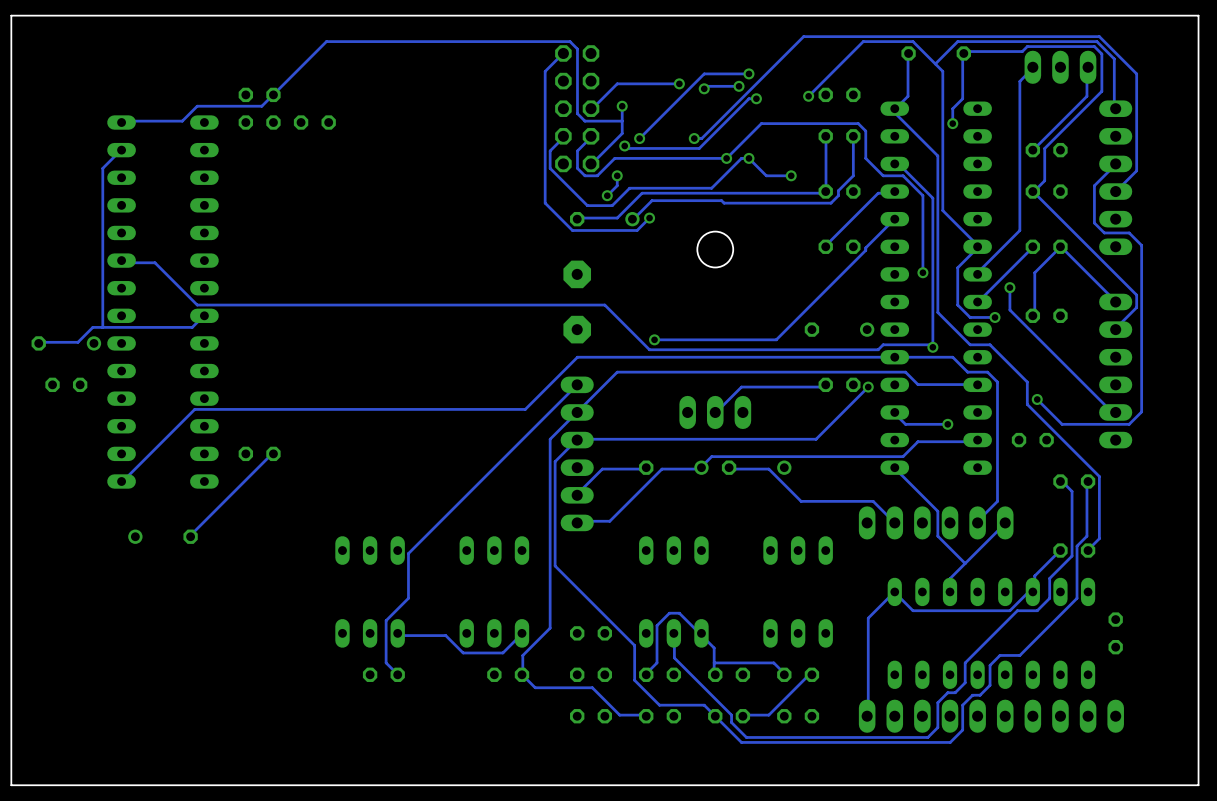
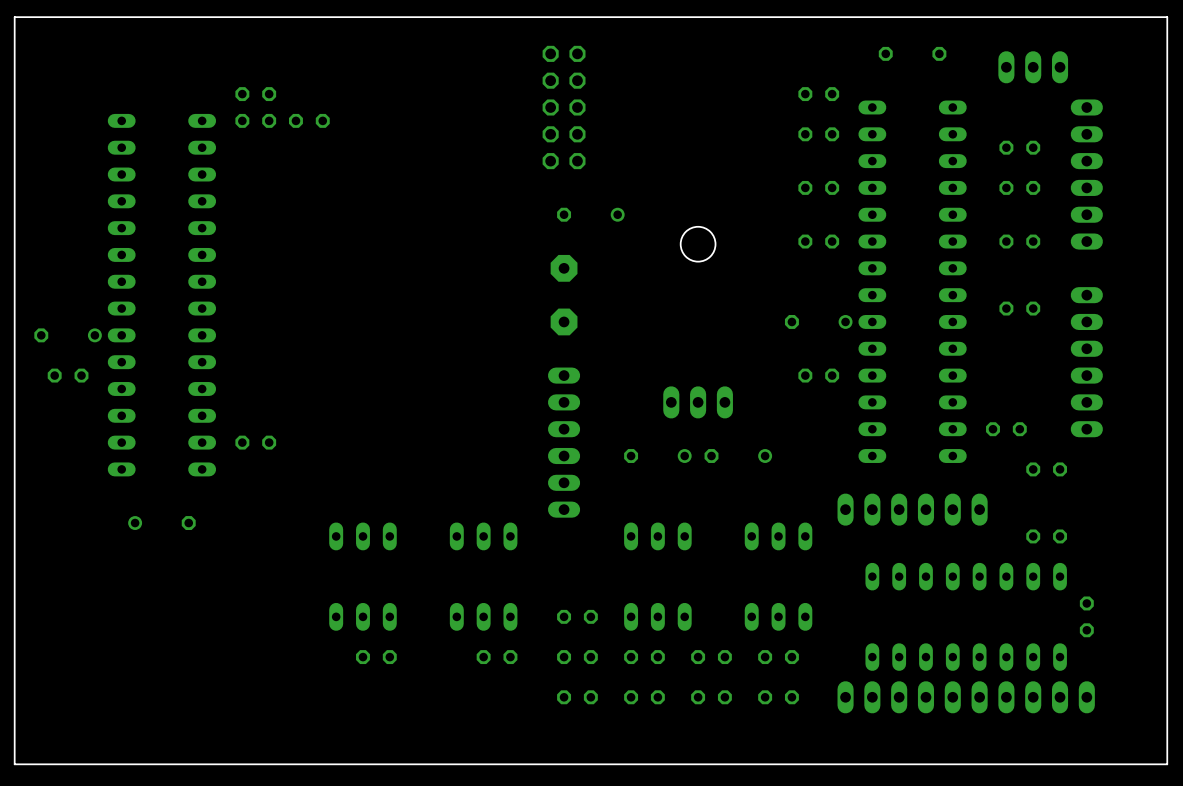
track: (563, 53) (545, 71) (545, 203) (572, 230) (637, 230) (649, 218) -> none
track: (908, 53) (908, 96) (895, 108) -> none
track: (935, 63) (957, 41) (1096, 41) (1114, 59) (1115, 108) -> none
track: (1032, 67) (1019, 81) (1019, 230) (977, 274) -> none
track: (1088, 67) (1086, 96) (1032, 150) -> none
track: (748, 73) (704, 73) (639, 138) -> none
via: (748, 73) -> none
track: (679, 83) (617, 83) (591, 108) -> none
via: (679, 83) -> none
track: (739, 86) (706, 86) (704, 88) -> none
via: (739, 86) -> none
via: (704, 88) -> none
track: (808, 96) (863, 41) (912, 41) (942, 71) (942, 210) (977, 245) (977, 247) (957, 267) (957, 305) (970, 317) (995, 317) -> none
via: (808, 96) -> none
track: (756, 98) (748, 98) (699, 148) (627, 148) (624, 145) -> none
via: (756, 98) -> none
track: (622, 106) (622, 133) (591, 163) -> none
via: (622, 106) -> none
track: (895, 108) (895, 113) (937, 155) (937, 312) (970, 344) (990, 344) (1027, 382) (1027, 404) (1099, 476) (1099, 538) (1088, 550) -> none
track: (622, 121) (584, 121) (577, 113) (577, 49) (570, 41) (326, 41) (261, 106) (197, 106) (182, 121) (121, 122) -> none
track: (952, 123) (952, 108) (962, 98) (962, 54) (965, 51) (1022, 51) (1027, 46) (1094, 46) (1101, 54) (1101, 91) (1044, 148) (1044, 180) (1032, 191) (1136, 295) (1136, 307) (1115, 329) -> none
via: (952, 123) -> none
track: (563, 136) (550, 150) (550, 168) (587, 205) (612, 205) (629, 188) (711, 188) (741, 158) (748, 158) (766, 175) (791, 175) -> none
track: (591, 136) (577, 150) (577, 168) (584, 175) (597, 175) (614, 158) (726, 158) (761, 123) (858, 123) (865, 131) (865, 158) (883, 175) (903, 175) (922, 195) (922, 272) -> none
track: (825, 136) (826, 190) (823, 193) (642, 193) (617, 218) (577, 219) -> none
track: (853, 136) (853, 175) (838, 190) (838, 195) (830, 203) (652, 200) (632, 219) -> none
via: (639, 138) -> none
track: (694, 138) (701, 138) (803, 36) (1099, 36) (1136, 73) (1136, 170) (1115, 191) -> none
via: (694, 138) -> none
via: (624, 145) -> none
track: (121, 150) (102, 168) (102, 327) -> none
via: (726, 158) -> none
via: (748, 158) -> none
track: (894, 163) (895, 165) (900, 165) (932, 198) (932, 347) -> none
track: (1115, 163) (1094, 185) (1094, 223) (1104, 232) (1129, 232) (1141, 245) (1141, 411) (1129, 424) (1062, 424) (1037, 399) -> none
track: (617, 175) (617, 185) (607, 195) -> none
via: (617, 175) -> none
via: (791, 175) -> none
track: (894, 191) (878, 193) (825, 246) -> none
via: (607, 195) -> none
via: (649, 218) -> none
track: (894, 219) (776, 339) (654, 339) -> none
track: (1032, 246) (977, 302) -> none
track: (121, 260) (122, 262) (154, 262) (197, 305) (604, 305) (649, 349) (878, 349) (883, 344) (932, 344) -> none
via: (922, 272) -> none
track: (1009, 287) (1009, 310) (1114, 414) (1115, 412) -> none
via: (1009, 287) -> none
track: (1115, 302) (1060, 246) (1034, 272) (1034, 314) (1032, 315) -> none
track: (204, 315) (192, 327) (92, 327) (77, 342) (38, 343) -> none
via: (995, 317) -> none
via: (654, 339) -> none
via: (932, 347) -> none
track: (577, 384) (408, 553) (408, 598) (386, 620) (386, 662) (397, 674) -> none
track: (825, 384) (823, 387) (741, 387) (715, 412) -> none
track: (977, 384) (917, 384) (905, 372) (617, 372) (577, 411) (550, 439) (550, 628) (522, 655) (521, 674) (535, 687) (592, 687) (619, 715) (646, 716) -> none
track: (868, 387) (816, 439) (577, 439) (555, 461) (555, 565) (634, 645) (634, 680) (659, 705) (704, 705) (741, 742) (950, 742) (962, 730) (962, 705) (972, 695) (980, 695) (990, 685) (990, 665) (999, 655) (1019, 655) (1077, 598) (1077, 546) (1086, 536) (1088, 481) -> none
via: (868, 387) -> none
via: (1037, 399) -> none
track: (894, 412) (905, 424) (947, 424) -> none
via: (947, 424) -> none
track: (977, 440) (977, 441) (917, 441) (903, 456) (711, 456) (699, 469) (661, 469) (609, 521) (577, 521) (577, 522) -> none
track: (273, 453) (190, 536) -> none
track: (646, 467) (602, 469) (577, 495) -> none
track: (729, 467) (768, 469) (801, 501) (873, 501) (894, 522) -> none
track: (894, 467) (937, 511) (937, 536) (965, 563) -> none
track: (121, 481) (194, 409) (525, 409) (577, 357) (952, 357) (967, 372) (987, 372) (997, 382) (997, 501) (977, 522) -> none
track: (1060, 481) (1072, 491) (1072, 556) (1049, 578) (1049, 598) (1037, 610) (1017, 610) (965, 662) (965, 682) (955, 692) (947, 692) (937, 702) (937, 727) (927, 737) (746, 737) (731, 722) (731, 715) (674, 657) (673, 633) -> none
track: (1005, 522) (950, 578) (950, 591) -> none
track: (1060, 550) (1034, 575) (1034, 590) (1032, 593) (1027, 593) (1009, 610) (912, 610) (894, 591) (893, 593) (868, 618) (867, 716) -> none
track: (521, 633) (502, 652) (463, 652) (445, 635) (398, 635) (397, 633) -> none
track: (714, 662) (773, 662) (784, 674) -> none
track: (715, 674) (714, 648) (679, 613) (669, 613) (657, 625) (657, 662) (646, 674) -> none
track: (811, 674) (811, 672) (768, 715) (742, 716) -> none

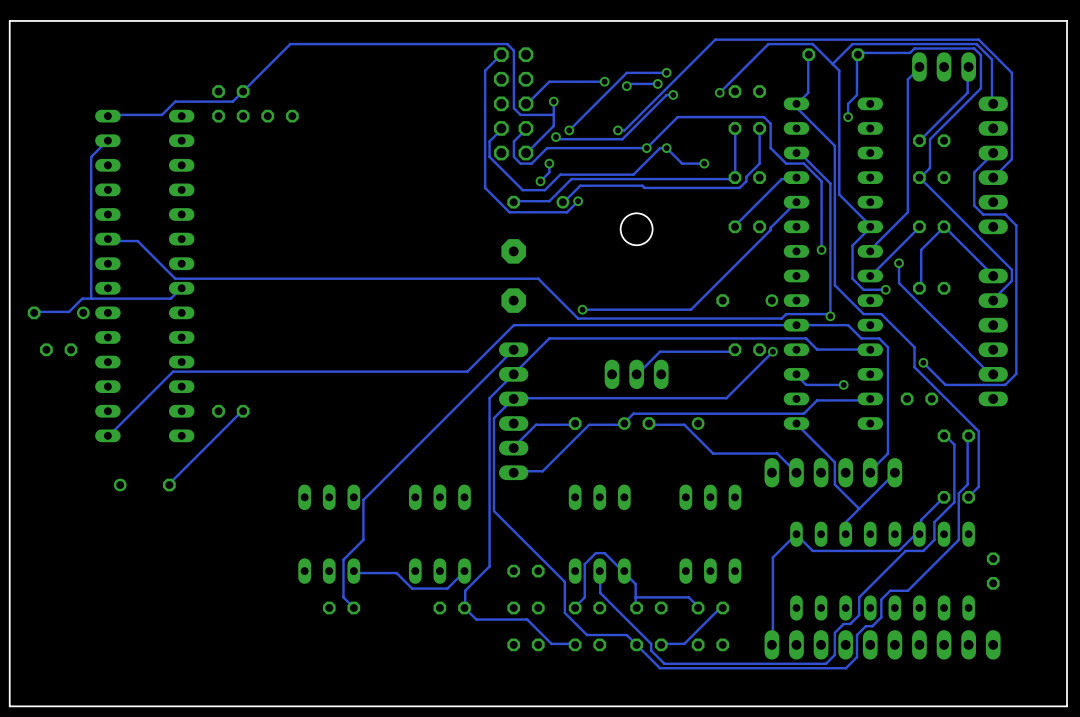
track: none -> (501, 54) (485, 70) (485, 187) (509, 212) (567, 212) (578, 201)
track: none -> (808, 54) (808, 92) (797, 103)
track: none -> (832, 64) (852, 44) (976, 44) (991, 59) (993, 103)
track: none -> (919, 66) (907, 79) (907, 212) (870, 251)
track: none -> (968, 66) (967, 92) (919, 140)
track: none -> (666, 72) (626, 72) (569, 130)
via: none -> (666, 72)
track: none -> (604, 81) (549, 81) (525, 103)
via: none -> (604, 81)
track: none -> (657, 83) (629, 83) (626, 86)
via: none -> (657, 83)
via: none -> (626, 86)
track: none -> (719, 92) (768, 44) (812, 44) (839, 70) (839, 194) (870, 225) (852, 245) (852, 278) (863, 289) (885, 289)
via: none -> (719, 92)
track: none -> (673, 94) (666, 94) (622, 139) (558, 139) (555, 137)
via: none -> (673, 94)
track: none -> (553, 101) (553, 125) (525, 153)
via: none -> (553, 101)
track: none -> (797, 103) (797, 108) (834, 145) (834, 285) (863, 314) (881, 314) (914, 347) (914, 367) (978, 431) (978, 486) (968, 497)
track: none -> (553, 114) (520, 114) (513, 108) (513, 50) (507, 44) (290, 44) (232, 101) (175, 101) (162, 114) (107, 116)
track: none -> (848, 117) (848, 103) (856, 94) (856, 55) (859, 52) (910, 52) (914, 48) (974, 48) (980, 55) (980, 88) (930, 139) (930, 168) (919, 177) (1011, 269) (1011, 280) (993, 300)
via: none -> (848, 117)
track: none -> (501, 128) (489, 141) (489, 156) (522, 190) (544, 190) (560, 174) (633, 174) (660, 148) (666, 148) (682, 163) (704, 163)
track: none -> (525, 128) (513, 141) (513, 156) (520, 163) (531, 163) (547, 148) (646, 148) (677, 117) (764, 117) (770, 123) (770, 148) (786, 163) (803, 163) (821, 181) (821, 249)
track: none -> (735, 128) (735, 176) (733, 179) (571, 179) (549, 201) (513, 202)
track: none -> (759, 128) (759, 163) (746, 176) (746, 181) (739, 187) (580, 185) (562, 202)
via: none -> (569, 130)
track: none -> (617, 130) (624, 130) (715, 39) (978, 39) (1011, 72) (1011, 159) (993, 177)
via: none -> (617, 130)
via: none -> (555, 137)
track: none -> (107, 140) (91, 156) (91, 298)
via: none -> (646, 148)
via: none -> (666, 148)
track: none -> (796, 153) (801, 154) (830, 183) (830, 316)
track: none -> (993, 153) (974, 172) (974, 205) (983, 214) (1005, 214) (1016, 225) (1016, 373) (1005, 384) (945, 384) (923, 362)
track: none -> (549, 163) (549, 172) (540, 181)
via: none -> (549, 163)
via: none -> (704, 163)
track: none -> (796, 177) (781, 179) (735, 226)
via: none -> (540, 181)
via: none -> (578, 201)
track: none -> (796, 202) (690, 309) (582, 309)
track: none -> (919, 226) (870, 275)
track: none -> (107, 239) (108, 241) (137, 241) (175, 278) (538, 278) (578, 318) (781, 318) (786, 314) (830, 314)
via: none -> (821, 249)
track: none -> (899, 263) (899, 283) (991, 376) (993, 374)
via: none -> (899, 263)
track: none -> (993, 275) (944, 226) (921, 249) (921, 287) (919, 288)
track: none -> (181, 288) (170, 298) (82, 298) (69, 311) (34, 312)
via: none -> (885, 289)
via: none -> (582, 309)
via: none -> (830, 316)
track: none -> (513, 349) (363, 500) (363, 539) (343, 559) (343, 597) (353, 607)
track: none -> (735, 349) (733, 351) (660, 351) (636, 374)
track: none -> (870, 349) (817, 349) (806, 338) (549, 338) (513, 373) (489, 398) (489, 566) (465, 590) (464, 607) (476, 619) (527, 619) (551, 643) (575, 644)
track: none -> (772, 351) (726, 398) (513, 398) (494, 418) (494, 511) (564, 581) (564, 612) (586, 635) (626, 635) (660, 668) (845, 668) (856, 657) (856, 635) (865, 626) (872, 626) (881, 617) (881, 599) (890, 590) (907, 590) (958, 539) (958, 493) (967, 484) (968, 435)
via: none -> (772, 351)
via: none -> (923, 362)
track: none -> (796, 374) (806, 384) (843, 384)
via: none -> (843, 384)
track: none -> (870, 398) (817, 400) (803, 413) (633, 413) (622, 424) (589, 424) (542, 471) (513, 472)
track: none -> (243, 411) (169, 485)
track: none -> (575, 423) (536, 424) (513, 448)
track: none -> (648, 423) (684, 424) (713, 453) (777, 453) (796, 472)
track: none -> (796, 423) (834, 462) (834, 484) (859, 508)
track: none -> (107, 435) (173, 371) (467, 371) (513, 325) (848, 325) (861, 338) (879, 338) (887, 347) (887, 453) (870, 472)
track: none -> (944, 435) (954, 444) (954, 502) (934, 522) (934, 539) (923, 550) (905, 550) (859, 597) (859, 615) (850, 623) (843, 623) (834, 632) (834, 654) (825, 663) (664, 663) (651, 650) (651, 643) (600, 592) (599, 571)
track: none -> (894, 472) (845, 522) (845, 534)
track: none -> (944, 497) (921, 519) (921, 533) (914, 535) (899, 550) (812, 550) (796, 534) (795, 535) (772, 557) (771, 644)
track: none -> (464, 571) (447, 588) (412, 588) (396, 573) (354, 573) (353, 571)
track: none -> (635, 597) (688, 597) (698, 607)
track: none -> (636, 607) (635, 584) (604, 553) (595, 553) (584, 564) (584, 597) (575, 607)
track: none -> (722, 607) (721, 606) (684, 643) (661, 644)

